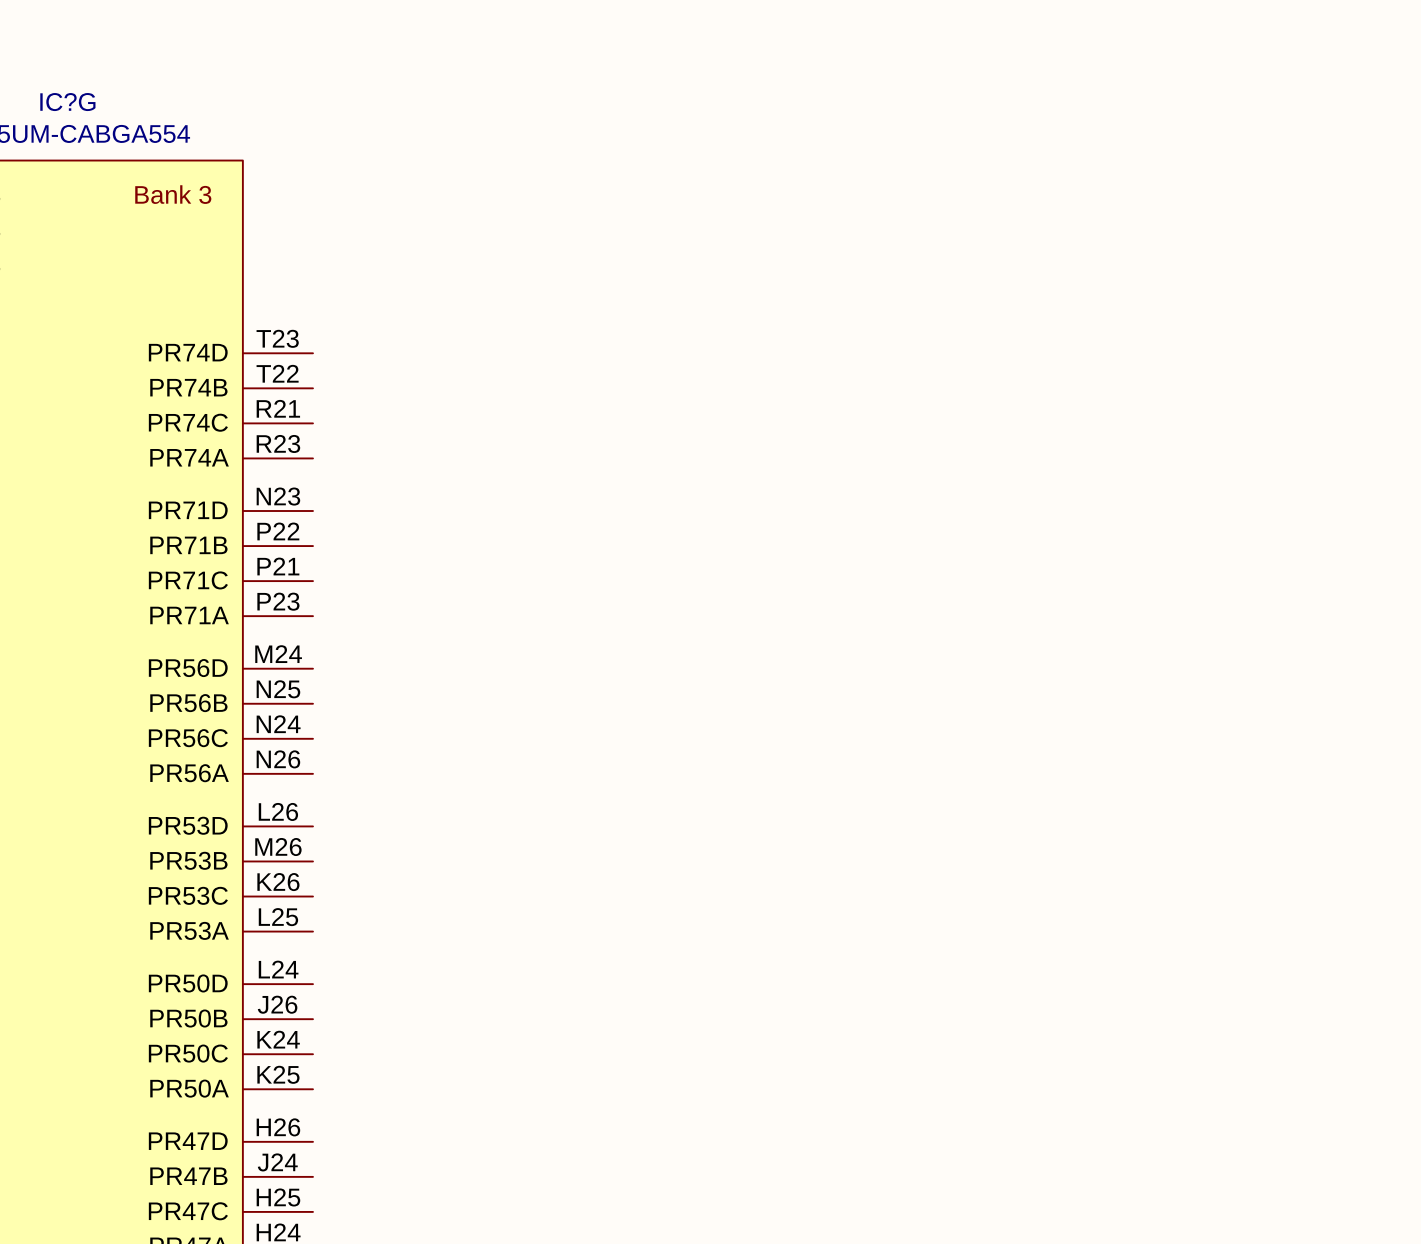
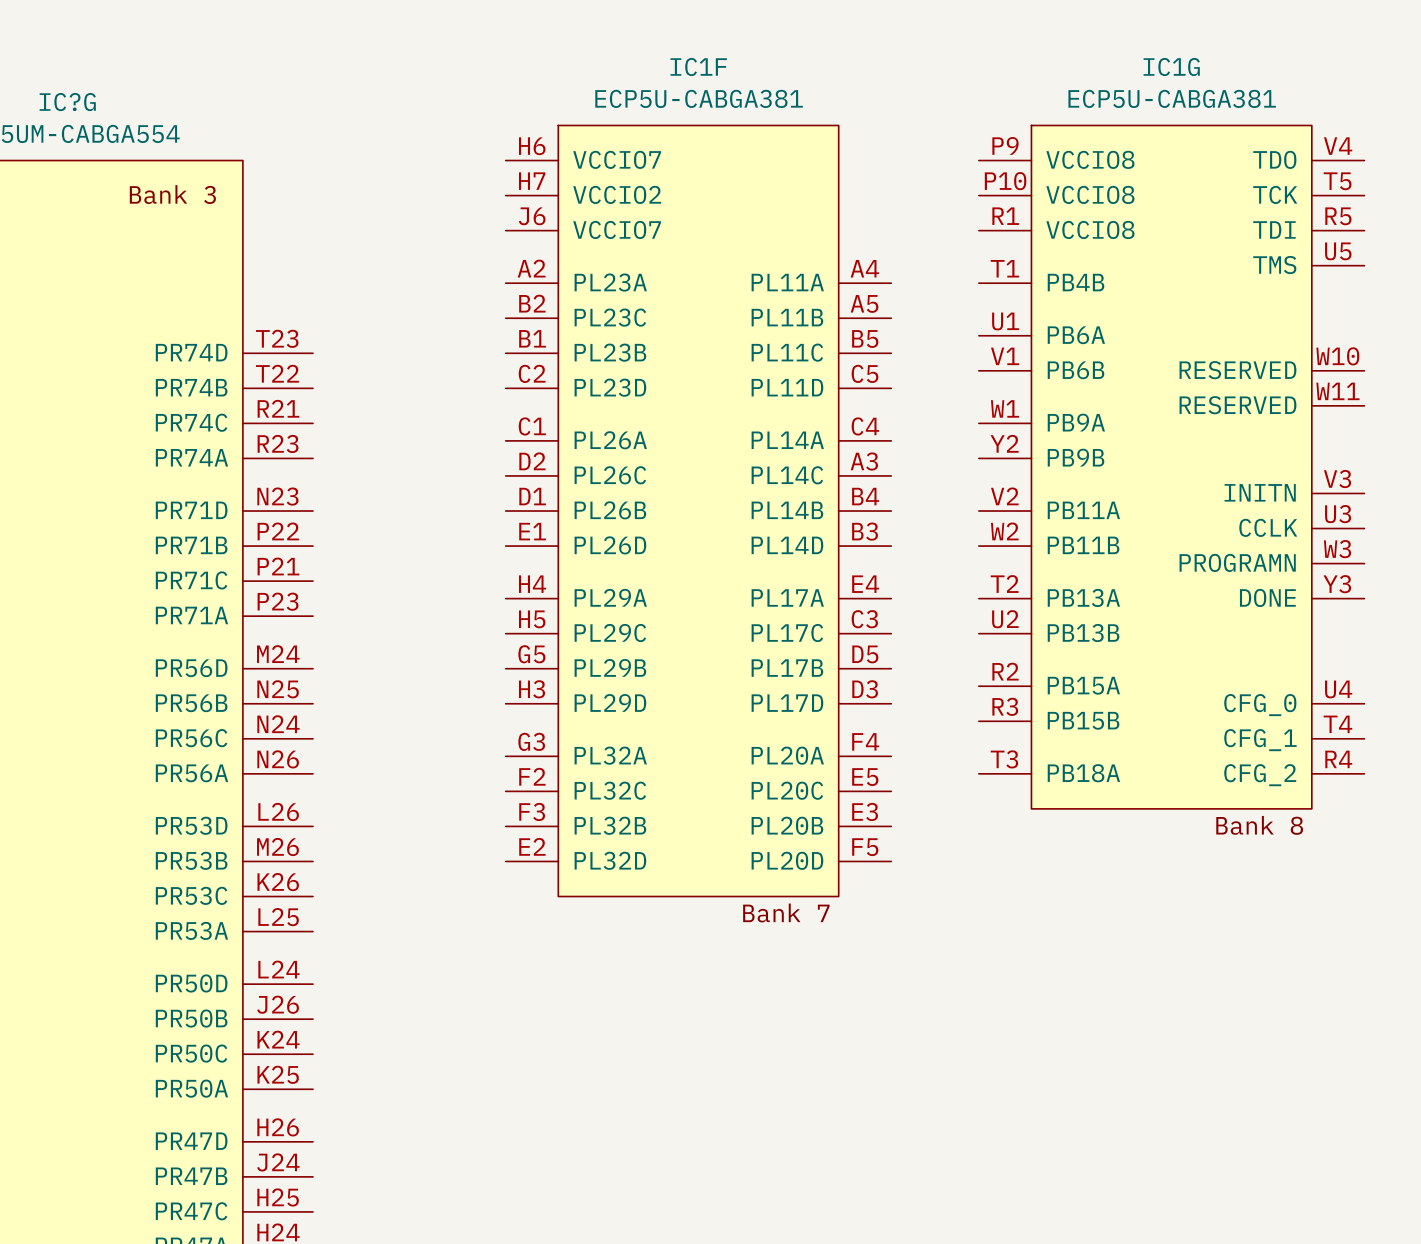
IC1G: none -> ECP5U-CABGA381 (1171, 467)
IC1F: none -> ECP5U-CABGA381 (698, 511)

